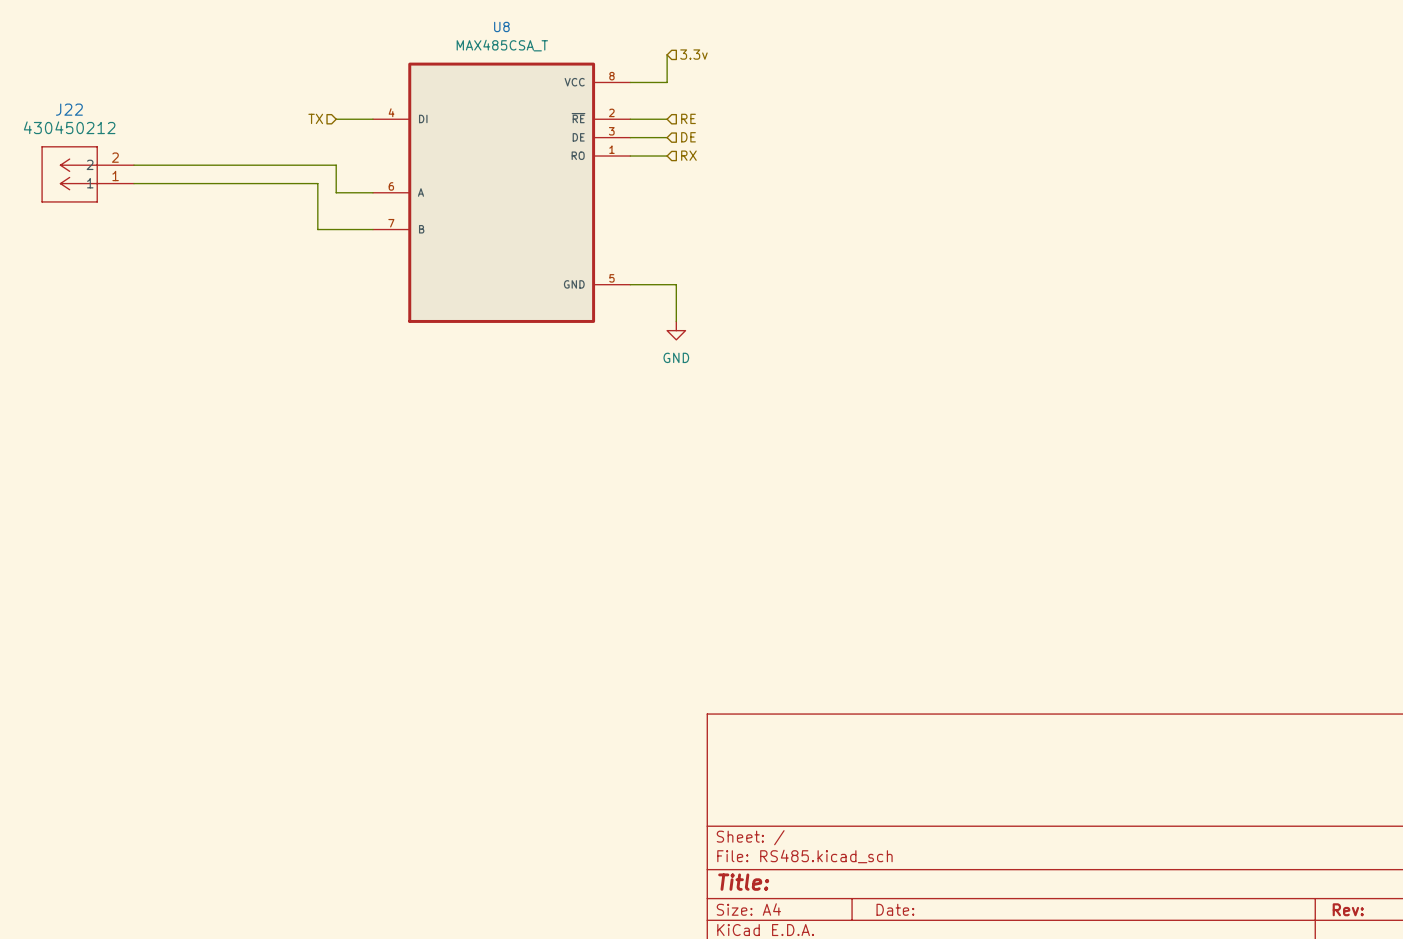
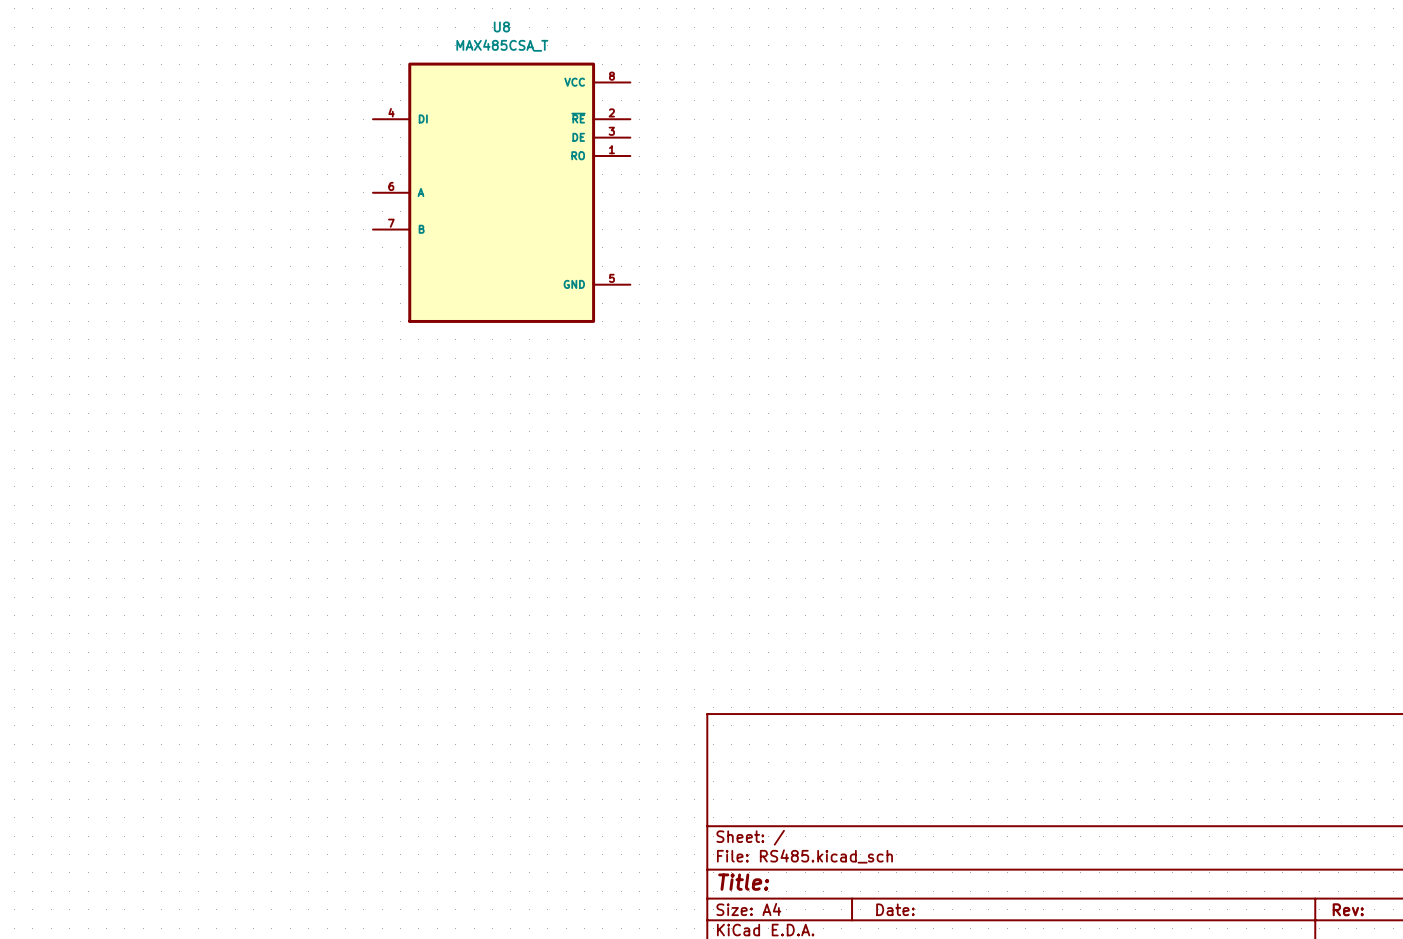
wire: (667, 54) (667, 82) (630, 82) -> none
hierarchical label: 3.3v (693, 54) -> none
hierarchical label: TX (315, 118) -> none
hierarchical label: RE (688, 118) -> none
wire: (336, 119) (372, 119) -> none
wire: (630, 119) (667, 119) -> none
wire: (630, 137) (667, 137) -> none
hierarchical label: DE (688, 137) -> none
hierarchical label: RX (688, 155) -> none
wire: (630, 156) (667, 156) -> none
wire: (133, 165) (336, 165) (336, 192) (372, 192) -> none
J22: 430450212 (87, 174) -> none
wire: (133, 183) (317, 183) (317, 229) (372, 229) -> none
wire: (630, 284) (676, 284) (676, 321) -> none
power symbol: GND (676, 330) -> none

